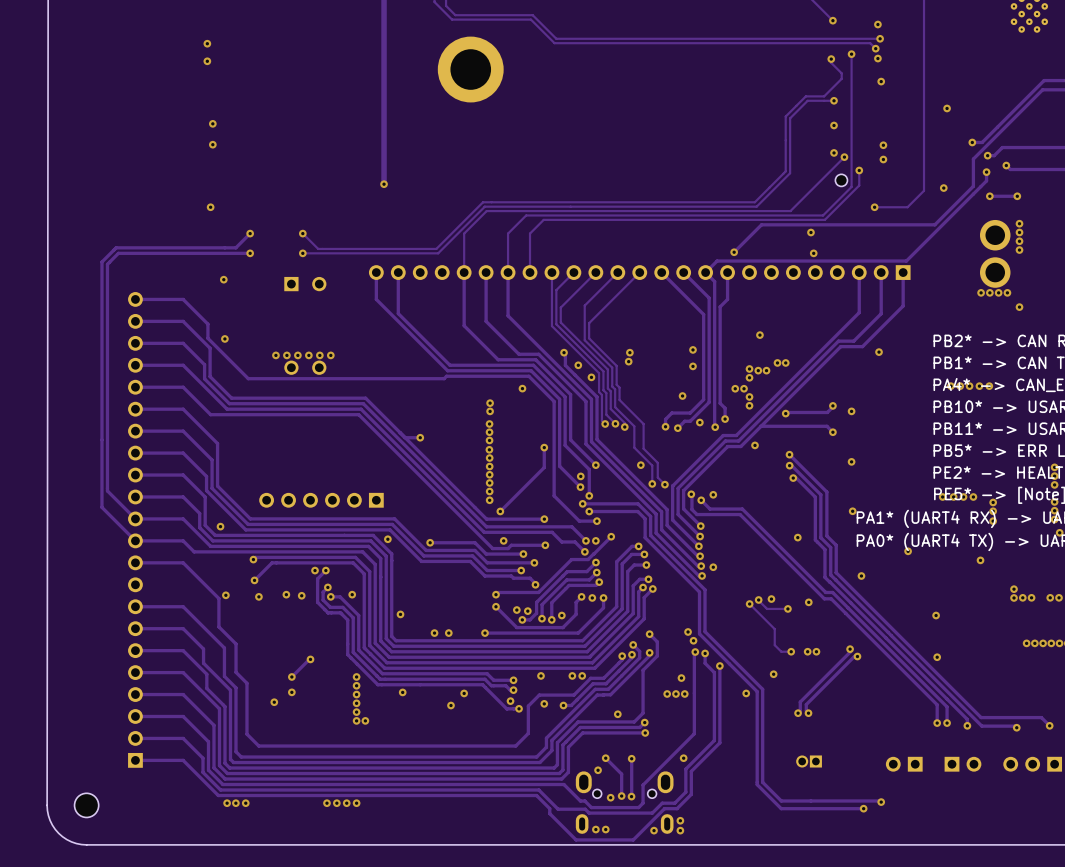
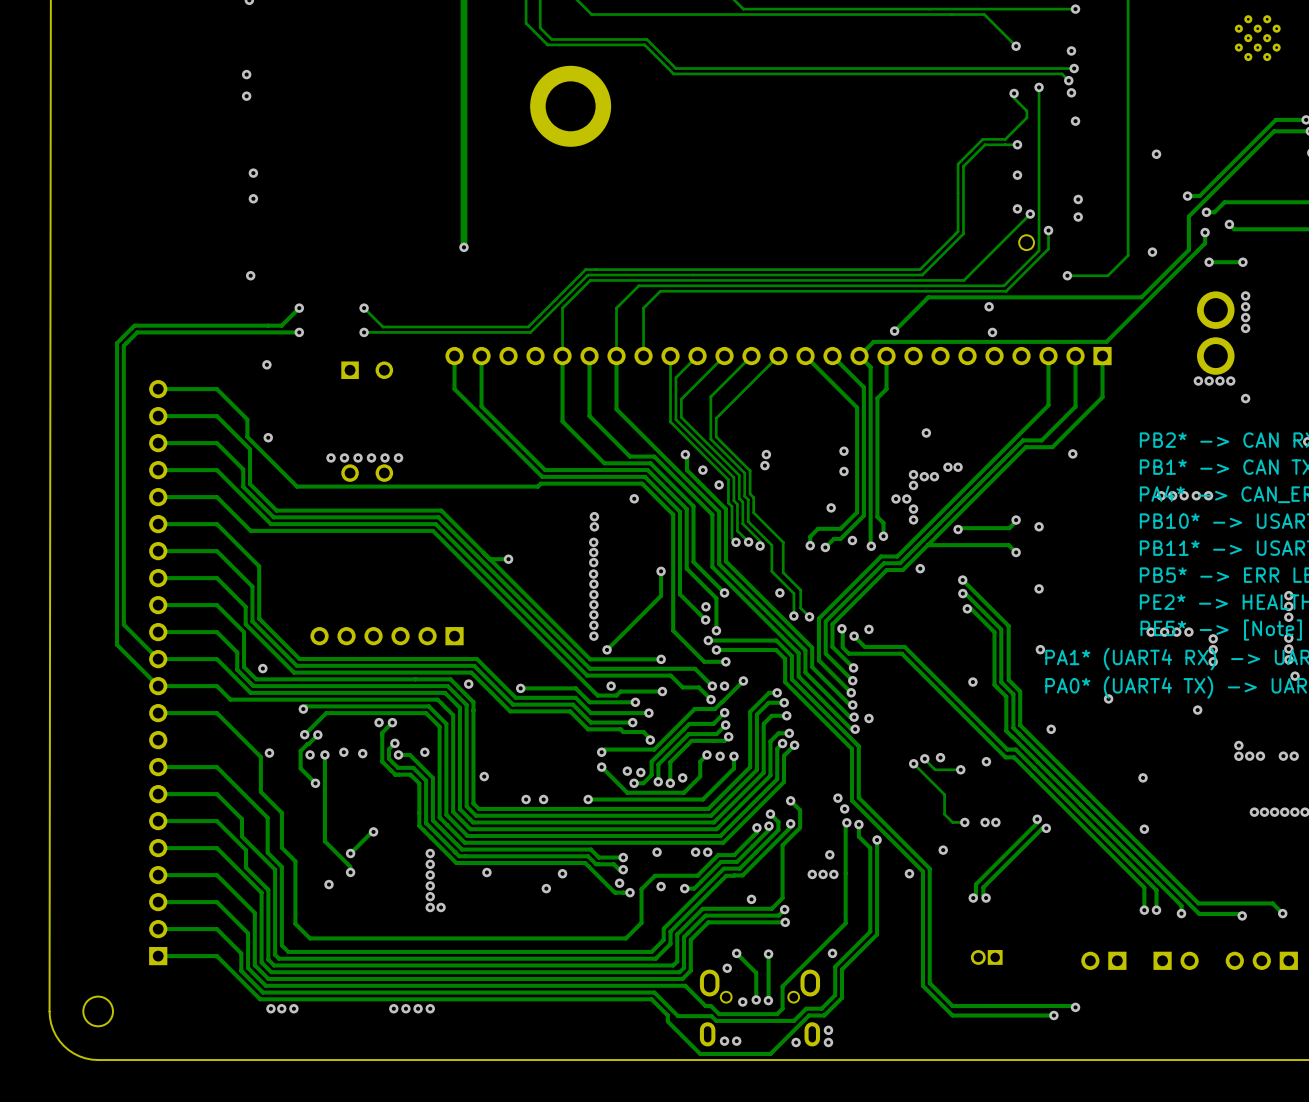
track: none -> (317, 734) (300, 751) (300, 768) (315, 783)
via: none -> (317, 734)
track: none -> (324, 754) (324, 841) (350, 866)
via: none -> (324, 754)
via: none -> (315, 783)

